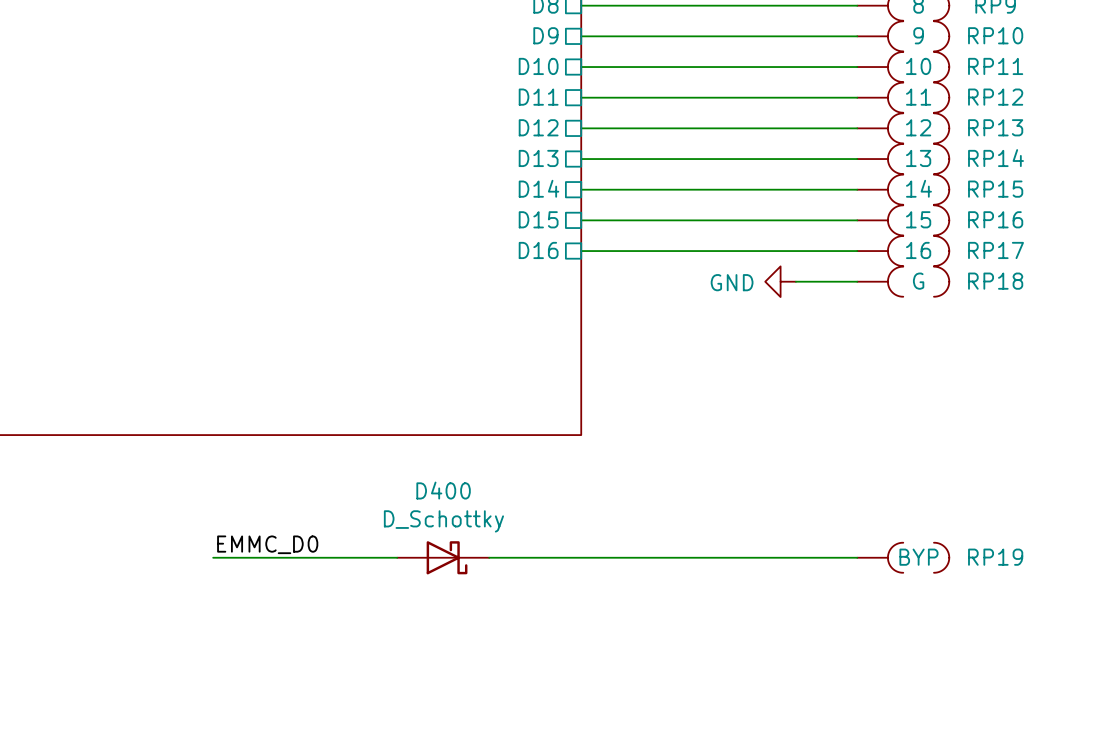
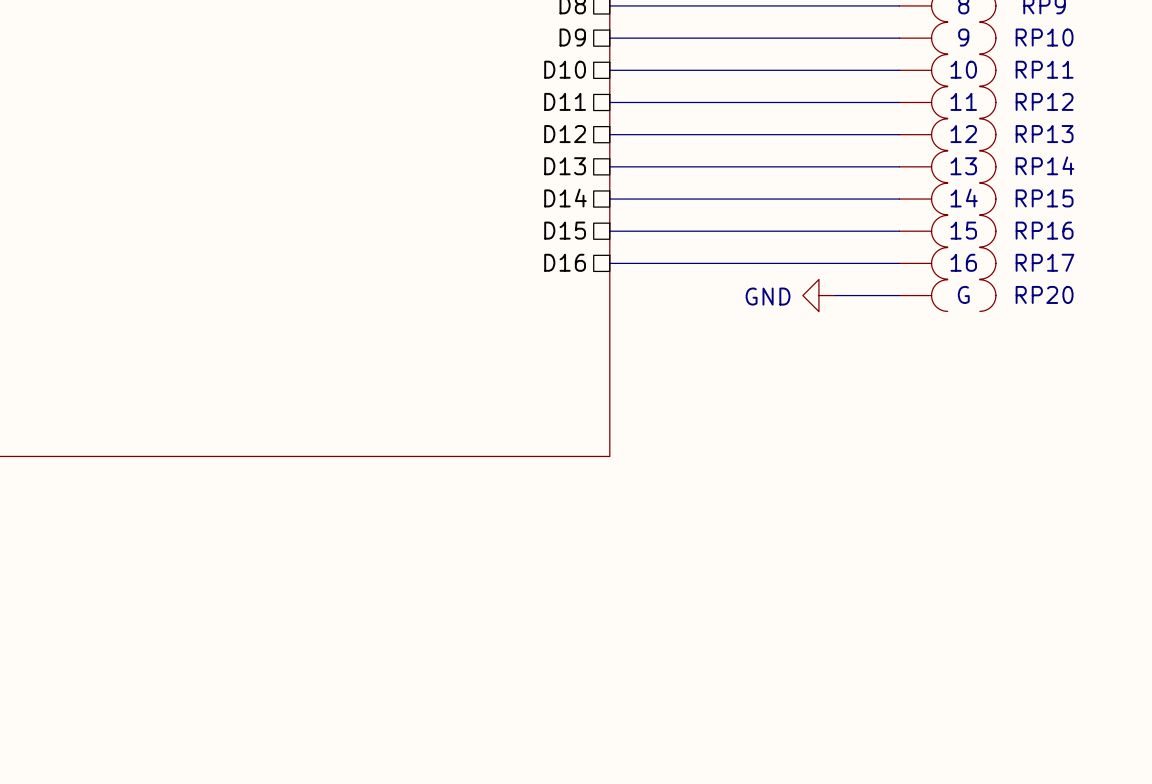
RP18 name: RP18 (995, 281) -> RP20 (1044, 294)
label: EMMC_D0 (267, 544) -> none
wire: (213, 557) (397, 557) -> none
D400: D_Schottky (443, 557) -> none
wire: (489, 557) (857, 557) -> none
RP19: BYP (903, 557) -> none

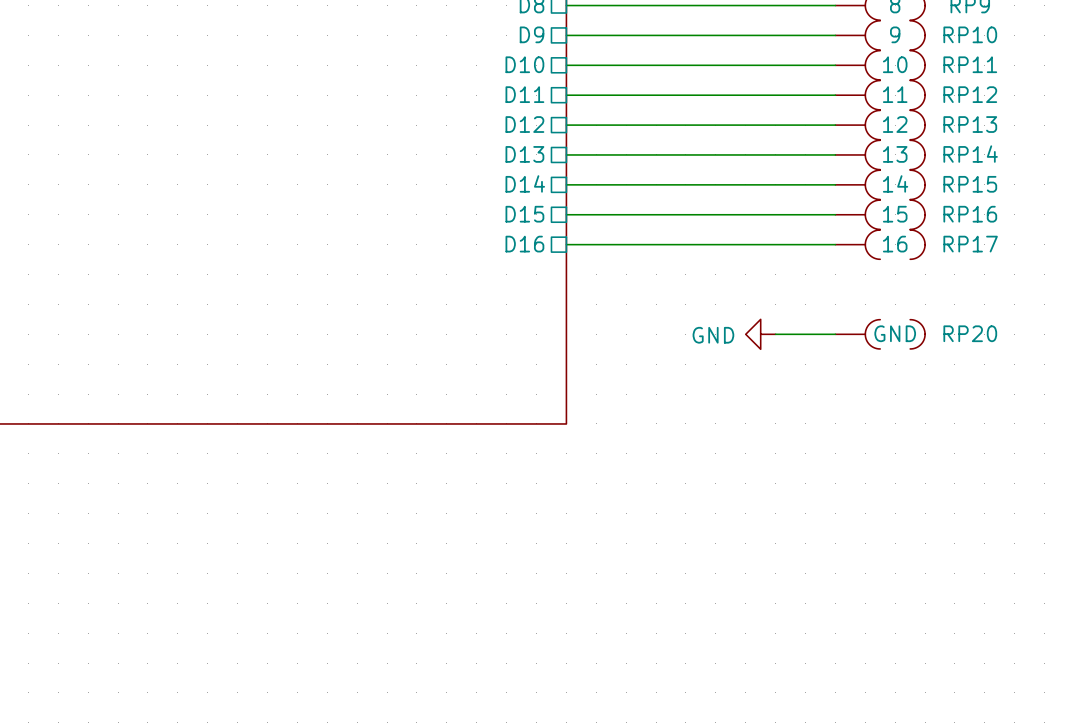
RP20 value: G (963, 294) -> GND (895, 333)
power symbol position: GND (818, 295) -> GND (760, 334)
wire: (835, 295) (899, 295) -> (775, 334) (835, 334)
RP20 position: (947, 295) -> (880, 334)

